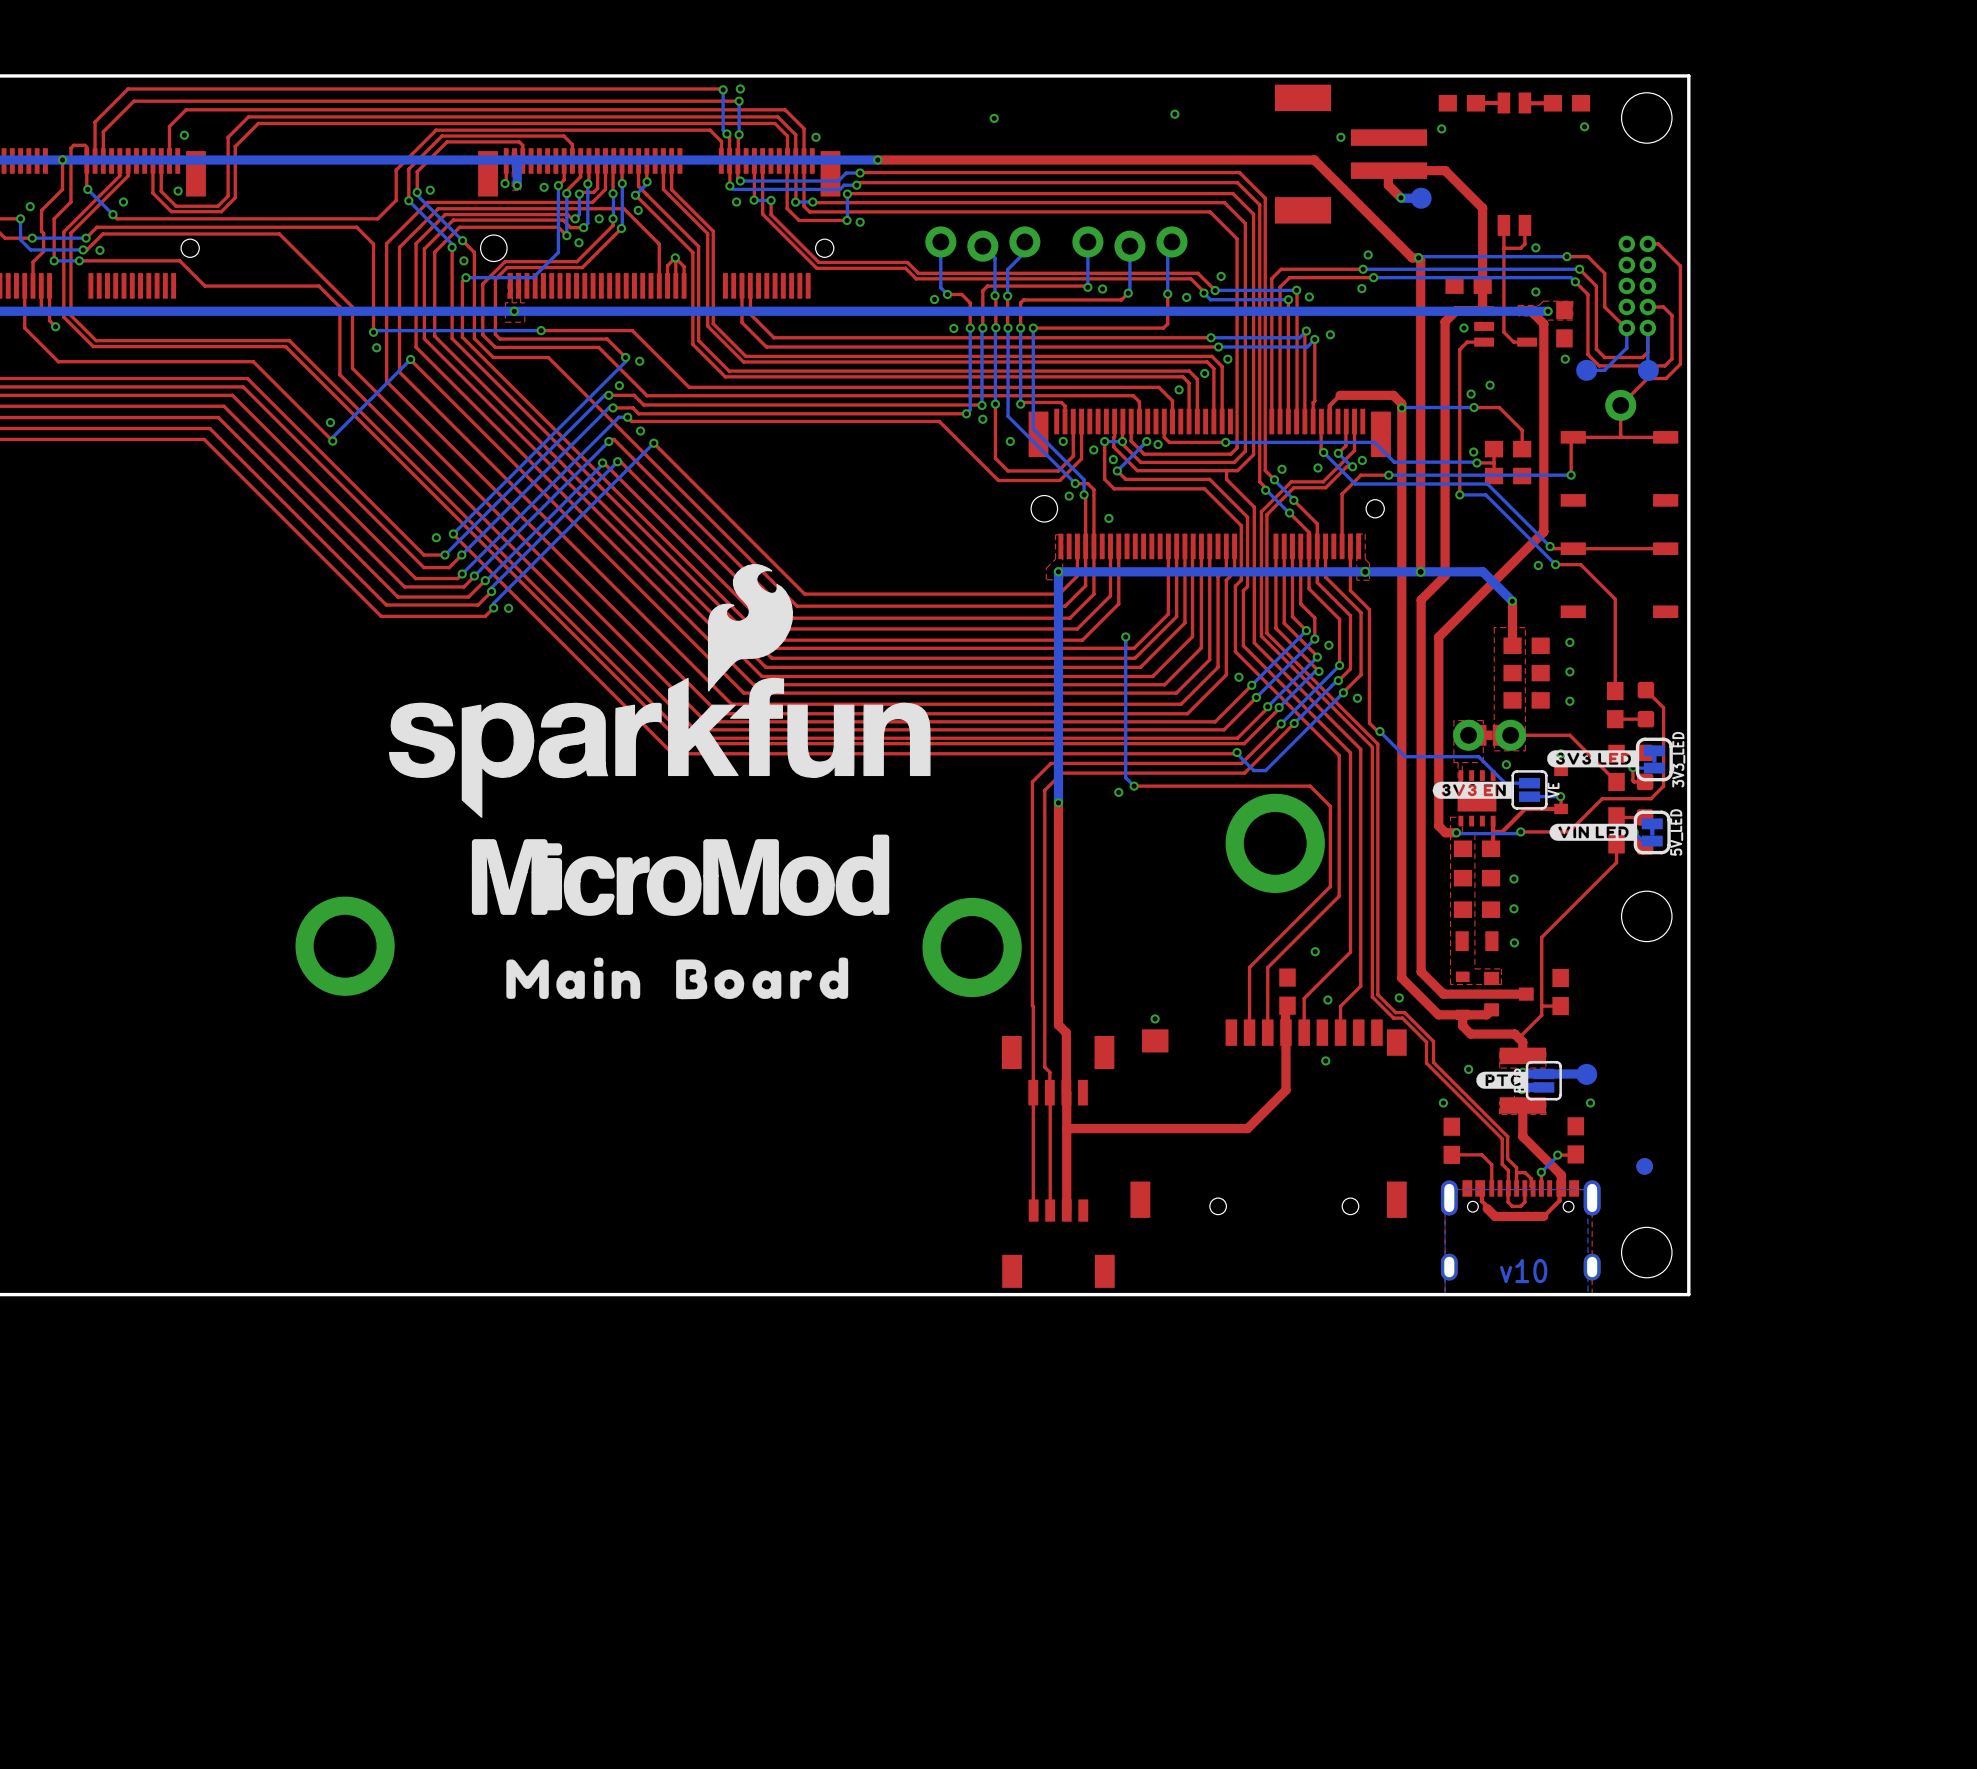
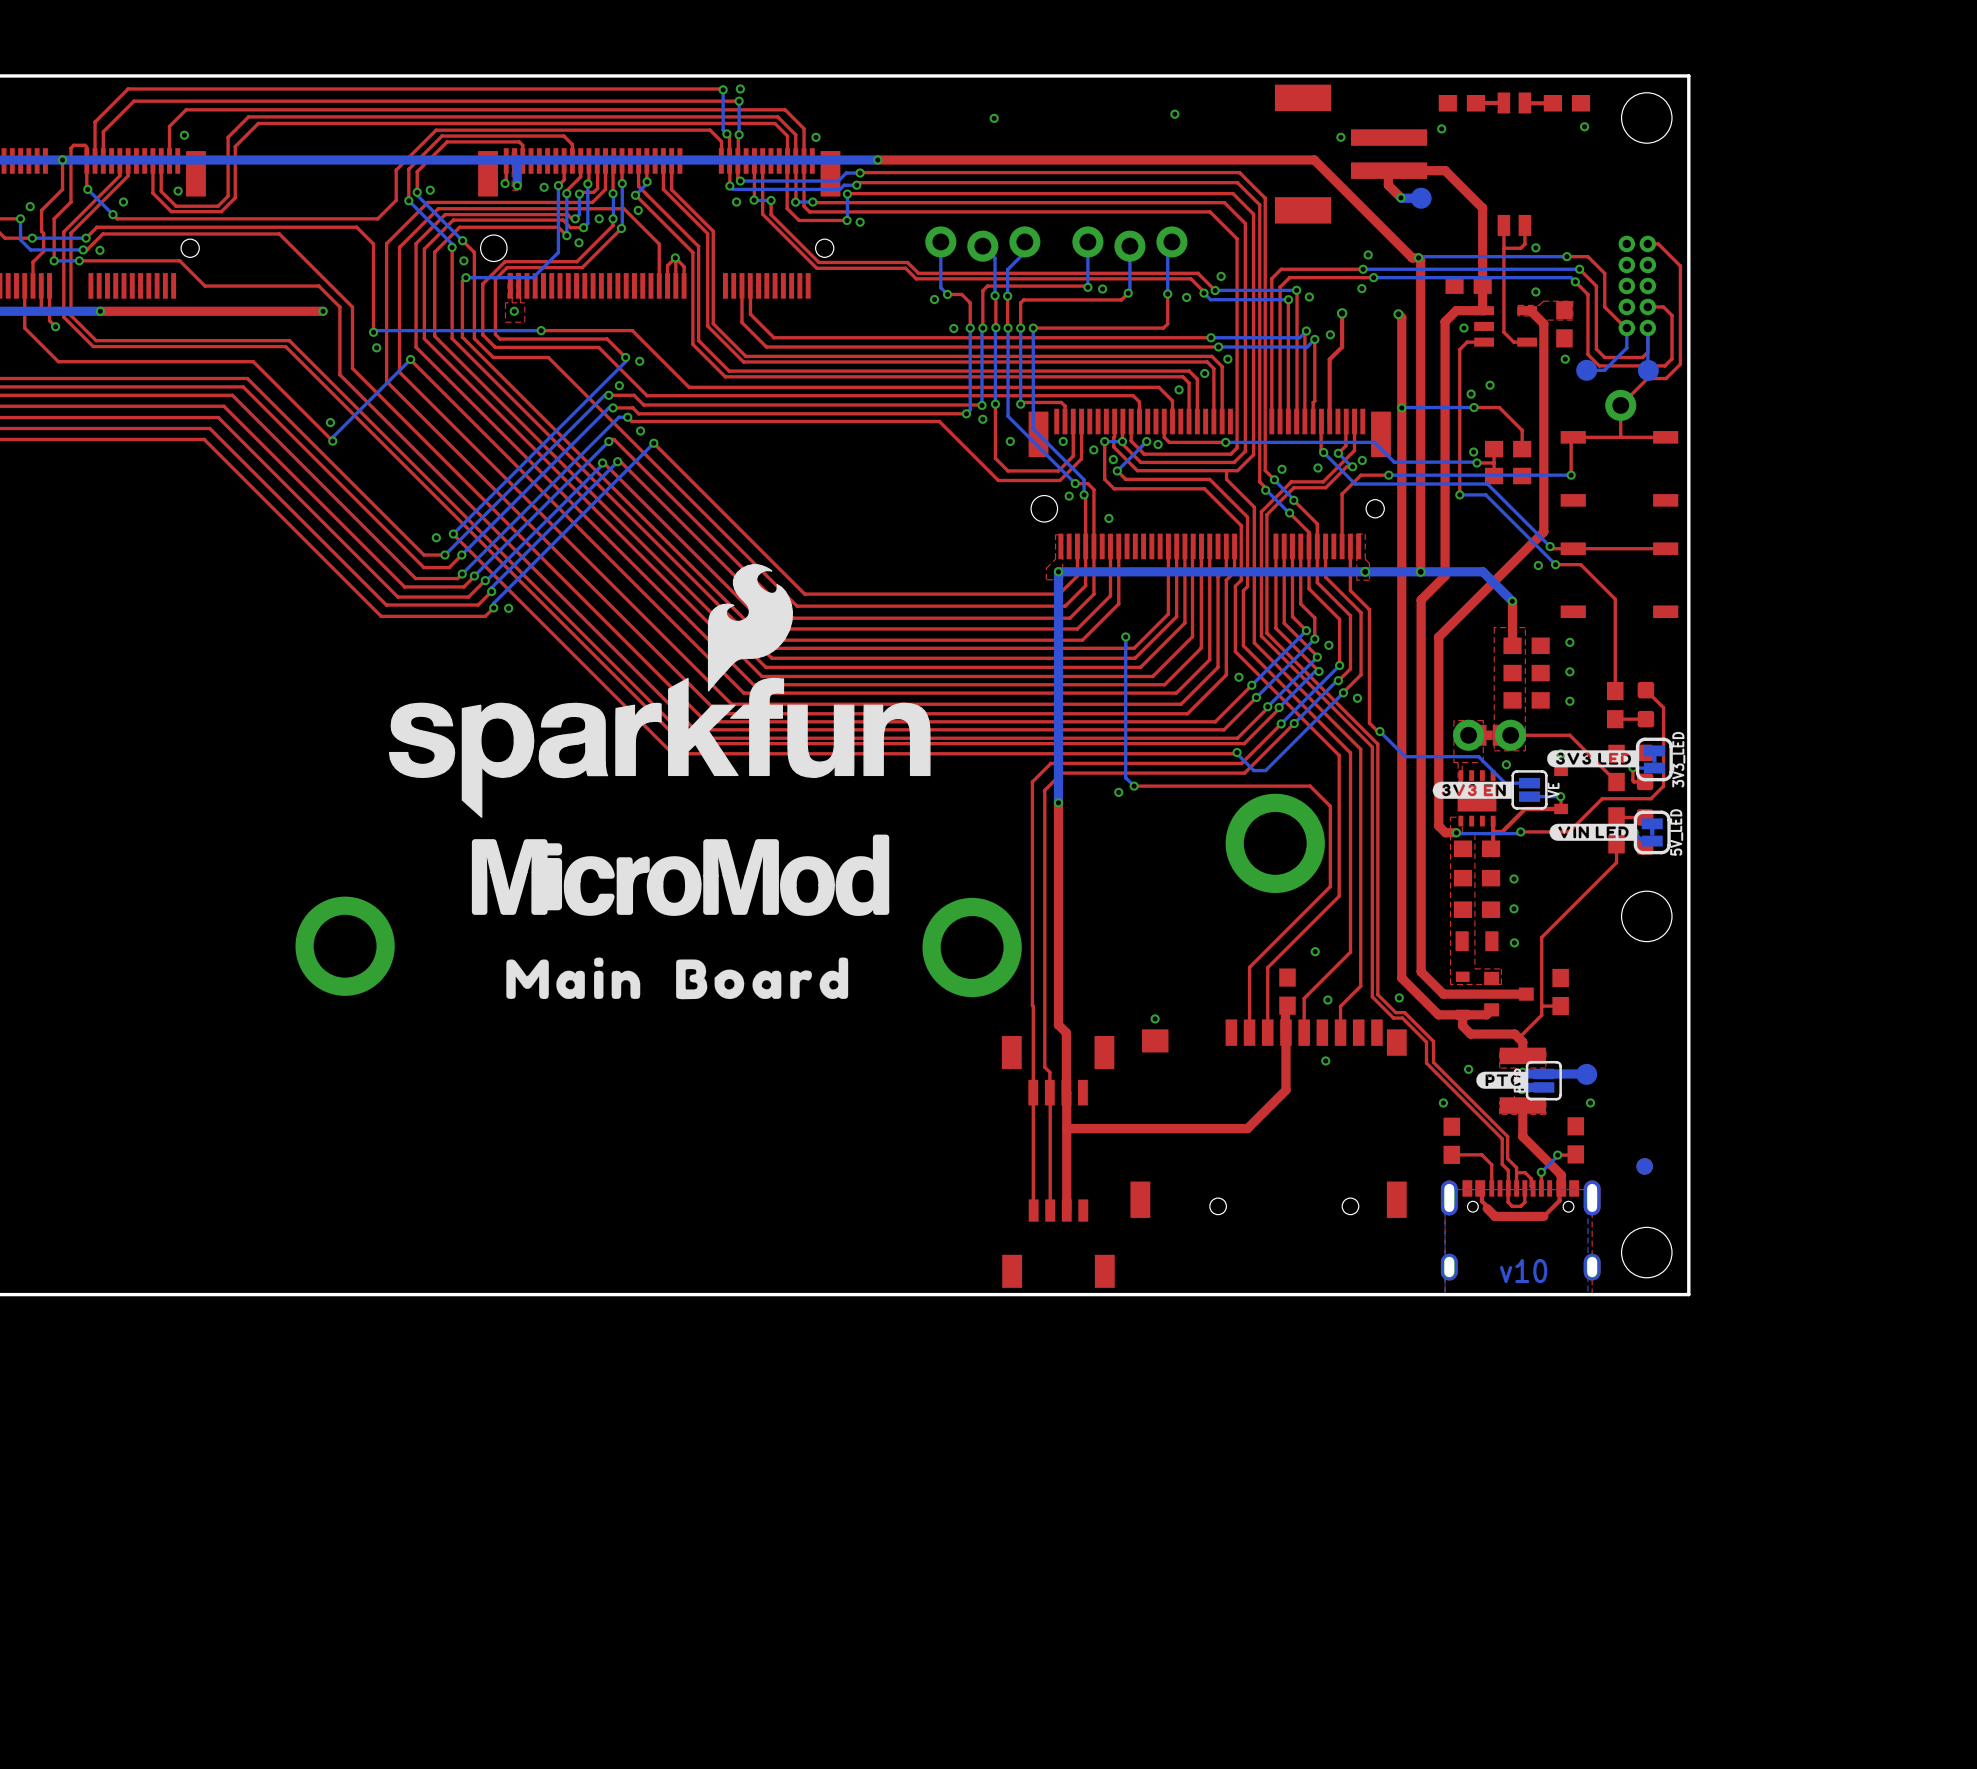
via: none -> (100, 311)
top track: none -> (323, 311) (100, 311)
via: none -> (323, 311)
bottom track: (1548, 311) (100, 311) -> none
via: (1548, 311) -> none
via: none -> (1342, 313)
top track: none -> (1398, 314) (1401, 317) (1401, 403)
via: none -> (1398, 314)
top track: (1401, 403) (1393, 395) (1340, 395) (1329, 405) -> (1342, 313) (1342, 347) (1329, 359) (1329, 405)

